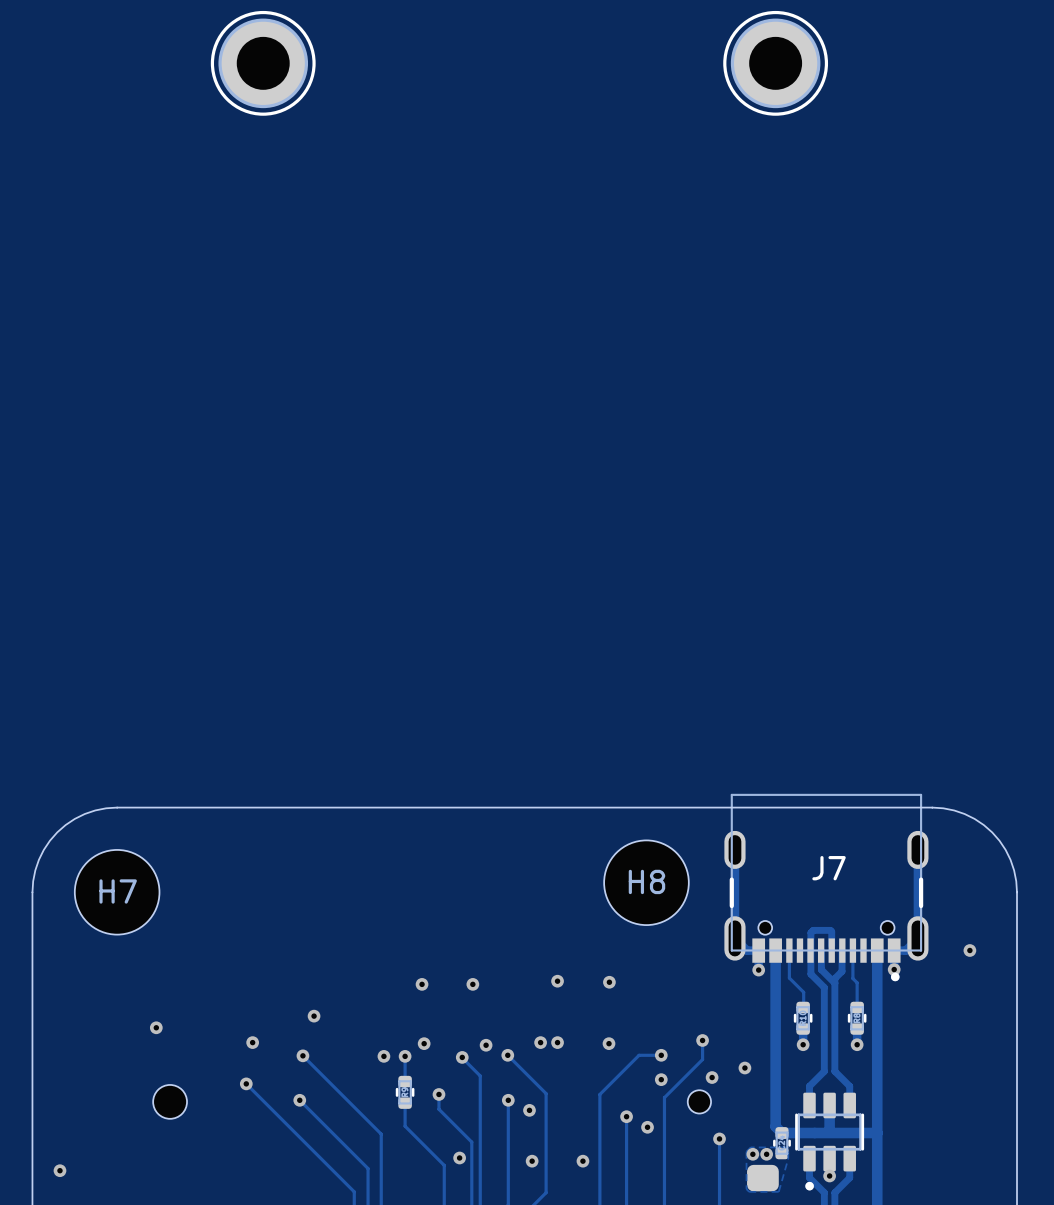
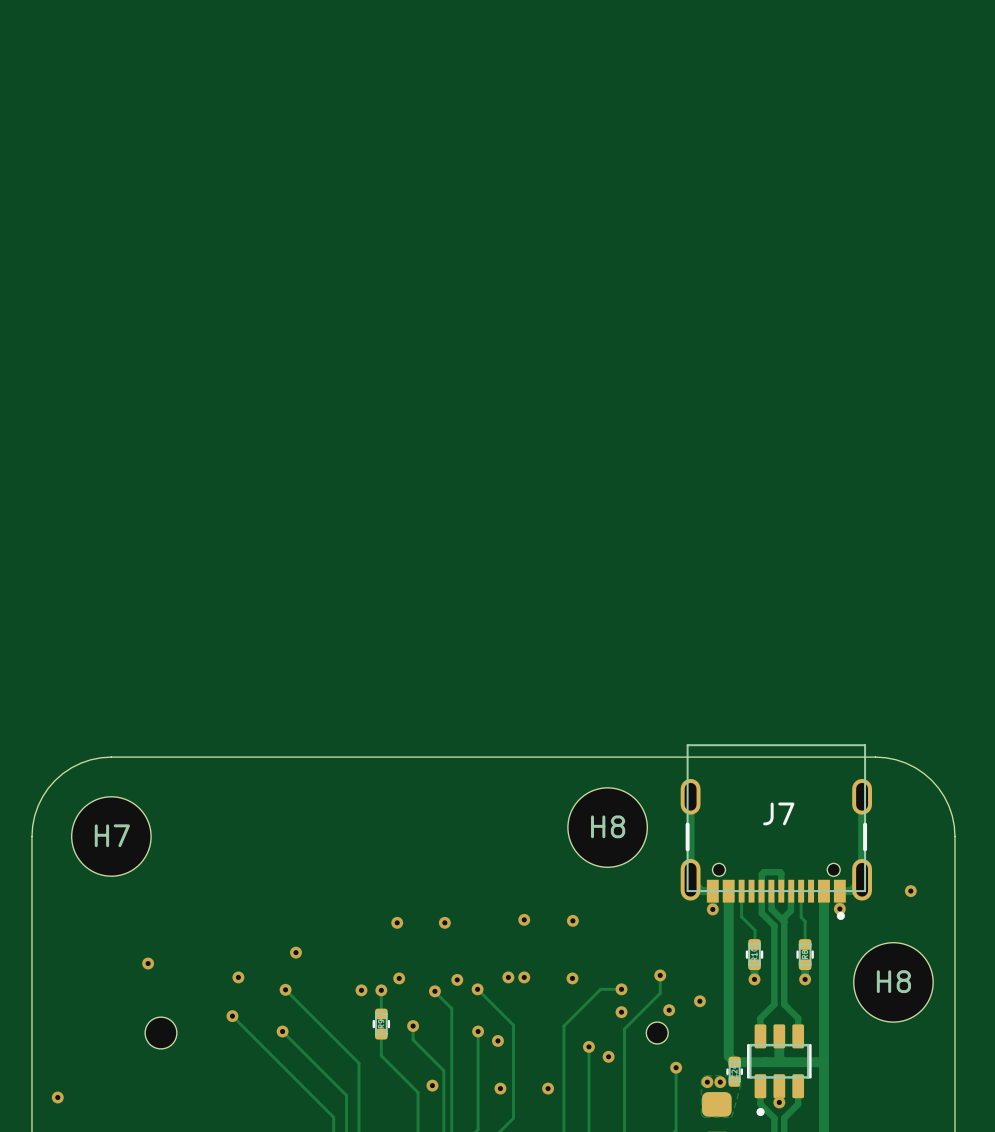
part: (263, 63) -> none
part: (775, 63) -> none
H8: none -> (893, 982)

